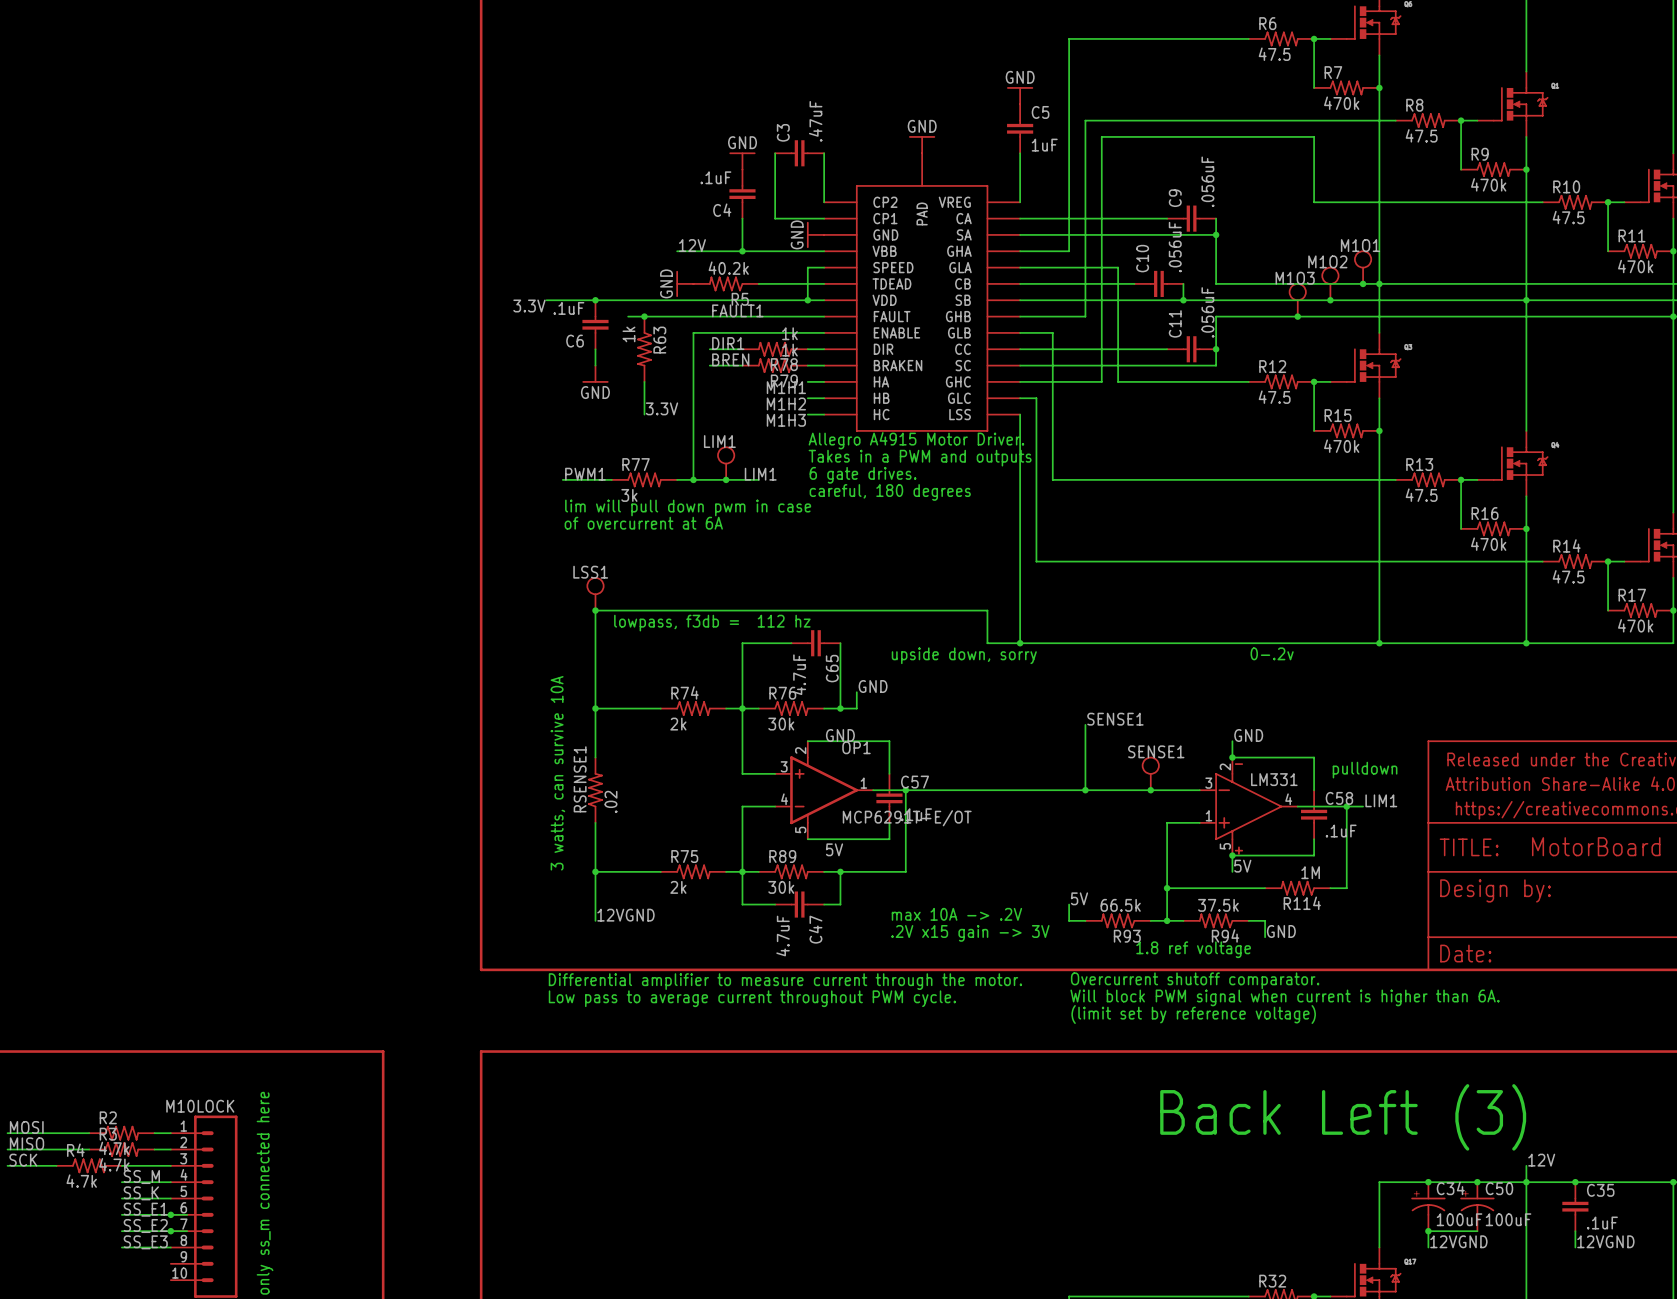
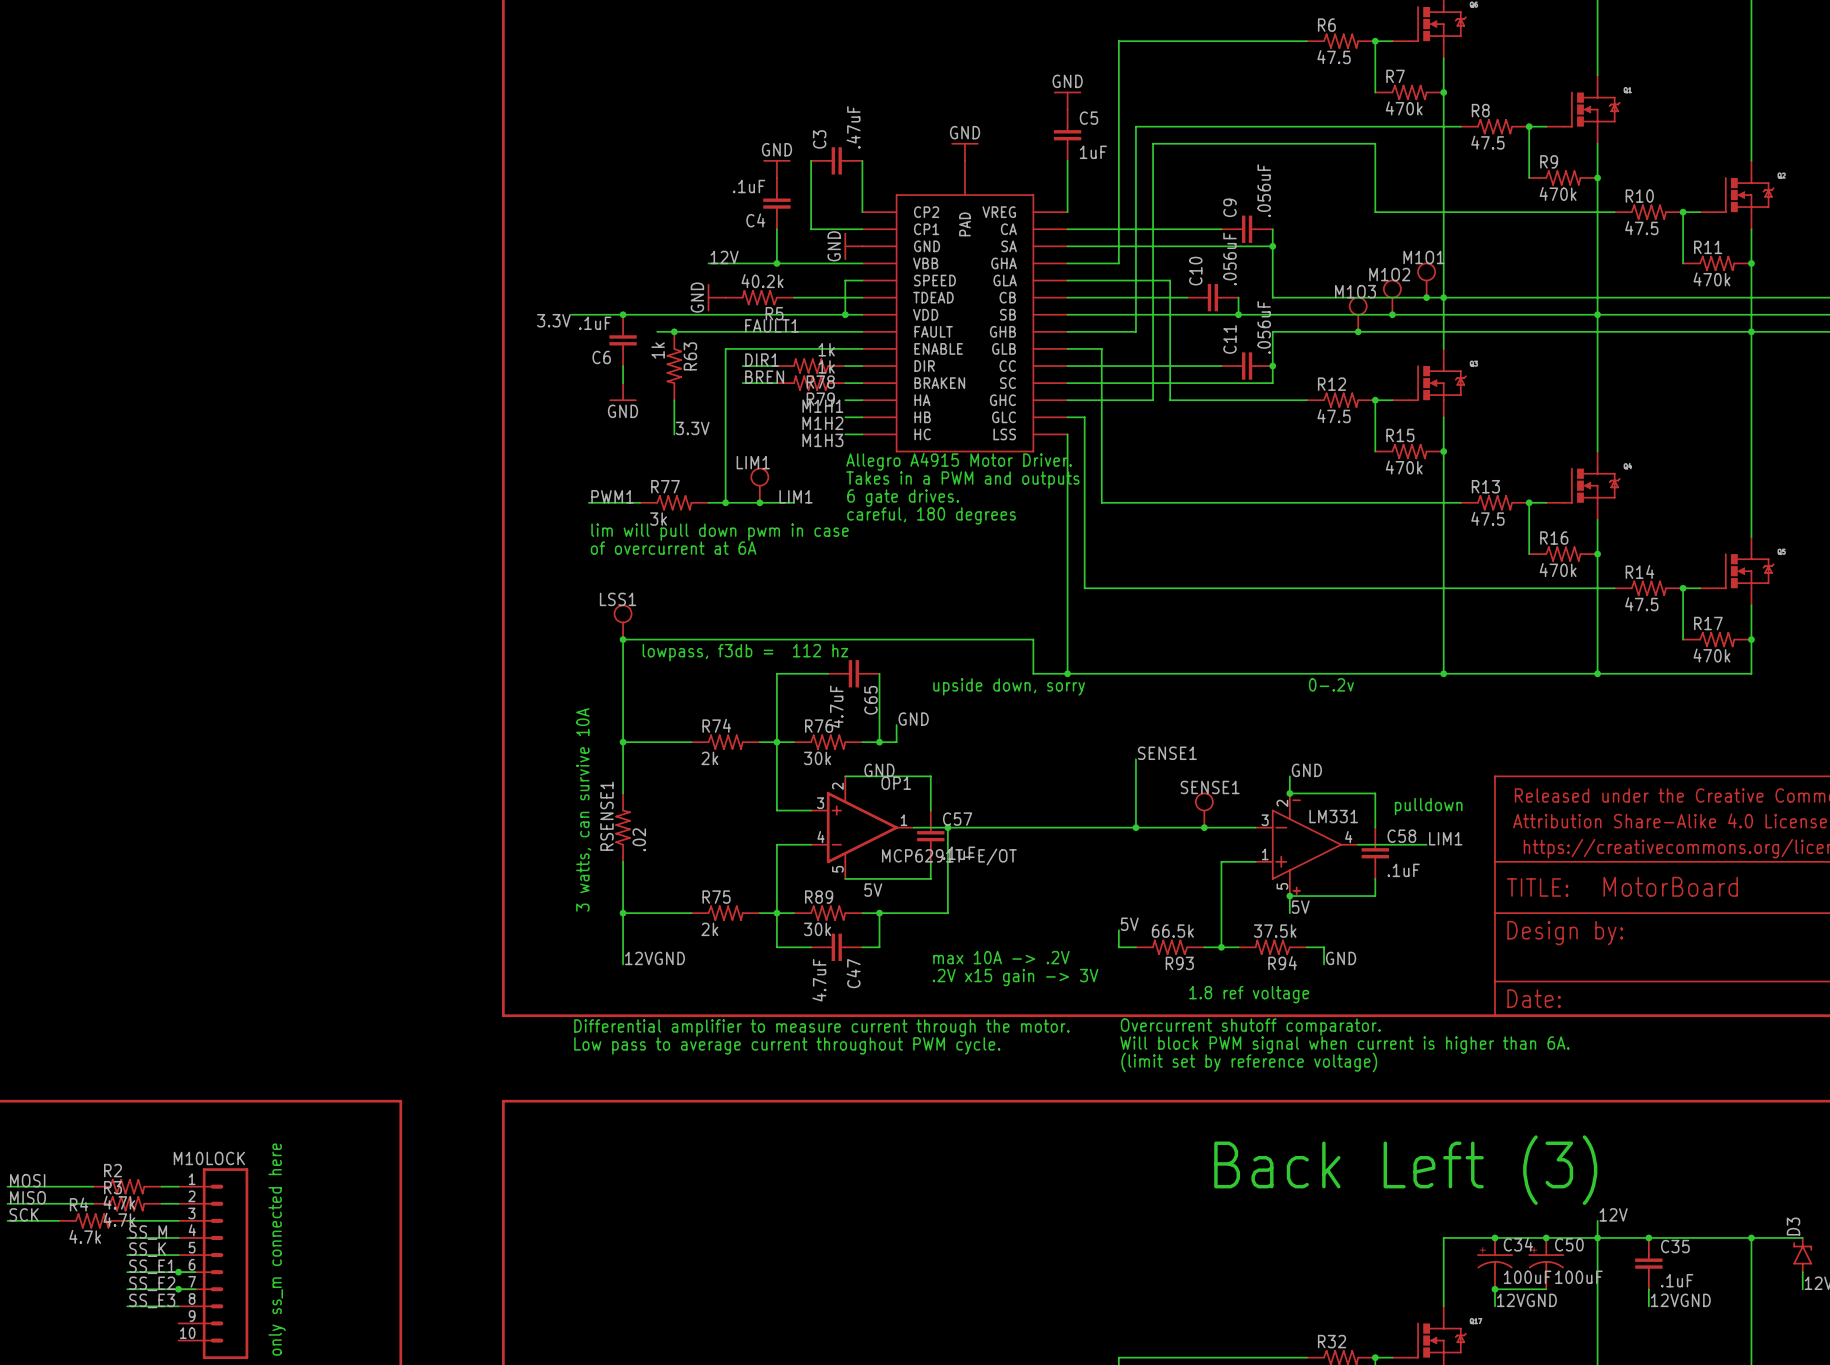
wire: (1346, 806) (1346, 888) (1330, 888) -> none
junction: (1346, 806) -> none
wire: (1167, 888) (1265, 888) -> none
junction: (1167, 888) -> none
R114: 1M (1297, 888) -> none
label position: 5V (1079, 898) -> 5V (1129, 924)
wire: (1069, 904) (1069, 920) (1085, 920) -> (1118, 930) (1118, 947) (1135, 947)
wire: (1167, 904) (1167, 920) -> none
junction: none -> (1221, 947)
R93 position: (1118, 920) -> (1170, 947)
wire: (1150, 920) (1183, 920) -> (1204, 947) (1238, 947)
junction: (1167, 920) -> none
R94 position: (1216, 920) -> (1272, 947)
wire: (1248, 920) (1265, 920) (1265, 937) -> (1306, 947) (1324, 947) (1324, 964)
label position: GND (1281, 931) -> GND (1341, 958)

